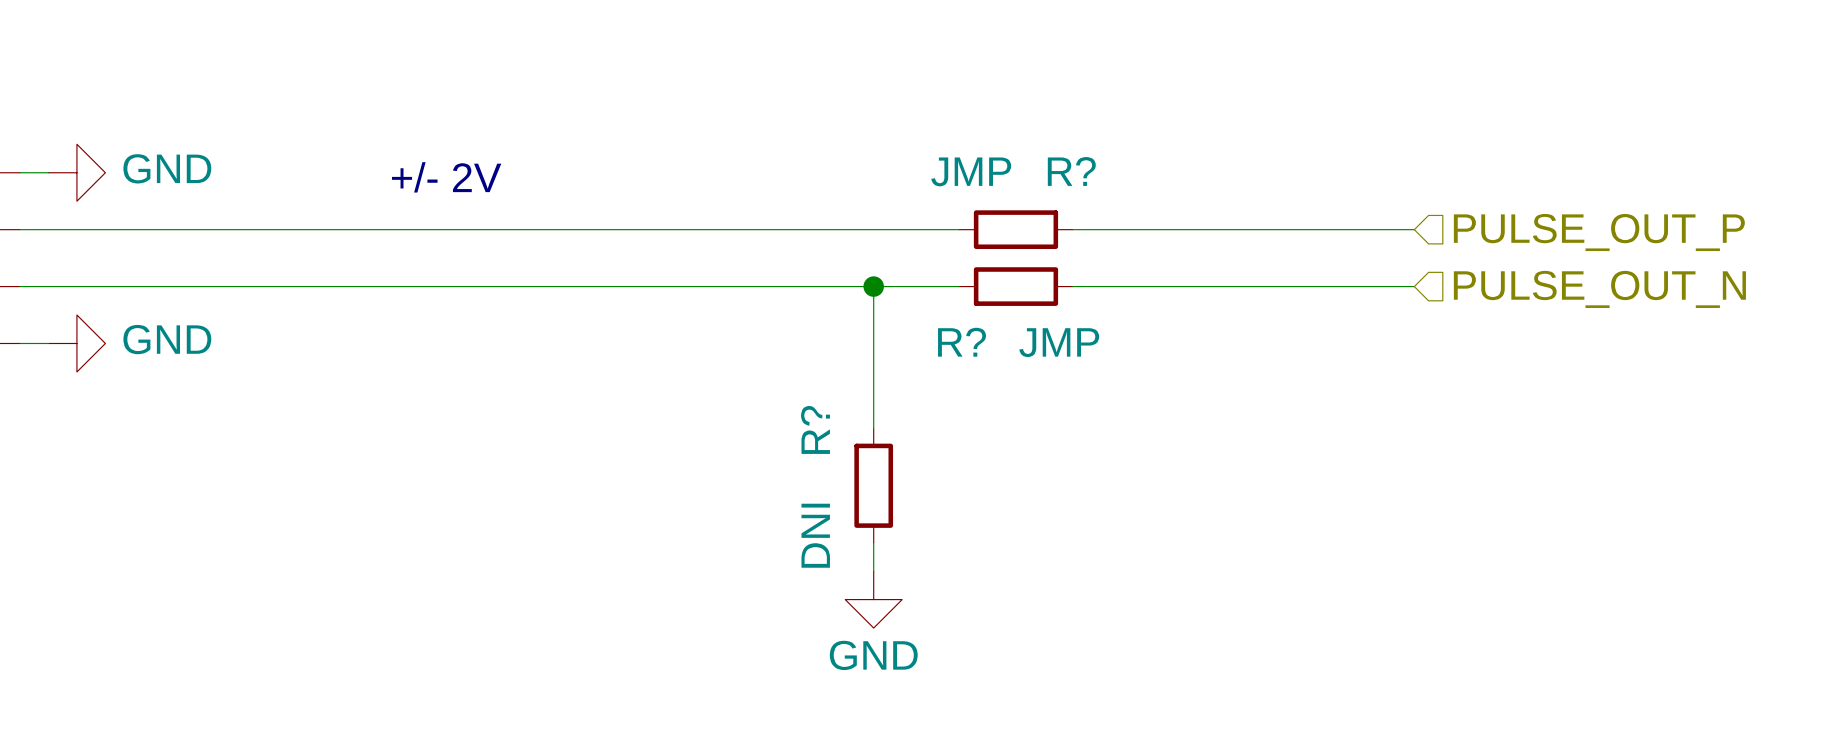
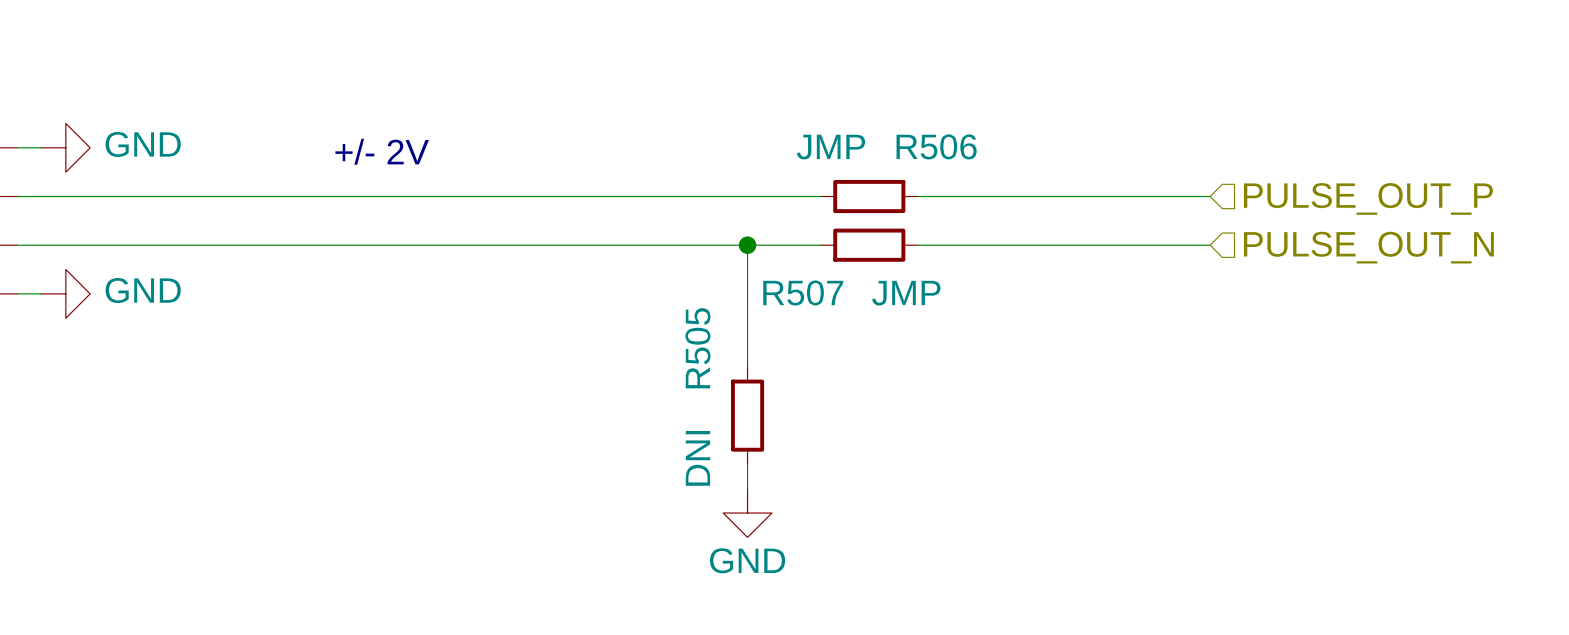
R? name: R? (1071, 171) -> R506 (936, 146)
R? name: R? (962, 342) -> R507 (803, 292)
R? name: R? (815, 429) -> R505 (697, 348)

